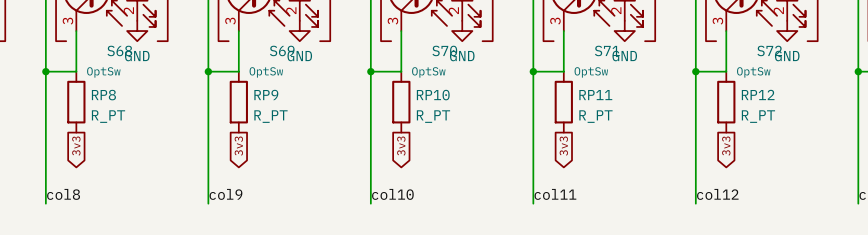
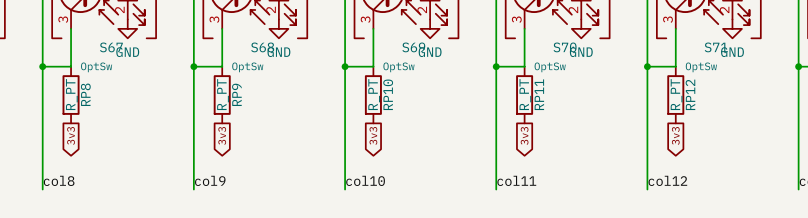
S68 name: S68 (119, 50) -> S67 (111, 47)
S69 name: S69 (282, 50) -> S68 (262, 47)
S70 name: S70 (444, 50) -> S69 (413, 47)
S71 name: S71 (607, 50) -> S70 (565, 47)
S72 name: S72 (769, 50) -> S71 (716, 47)
RP9 name rotation: 0° (266, 94) -> 90° counterclockwise (236, 94)
RP12 name rotation: 0° (758, 94) -> 90° counterclockwise (690, 94)
RP8 name rotation: 0° (103, 95) -> 90° counterclockwise (85, 94)
RP10 name rotation: 0° (433, 95) -> 90° counterclockwise (388, 94)
RP11 name rotation: 0° (595, 95) -> 90° counterclockwise (539, 94)
RP8 value rotation: 0° (108, 116) -> 90° counterclockwise (71, 94)
RP9 value rotation: 0° (270, 116) -> 90° counterclockwise (223, 94)
RP10 value rotation: 0° (433, 116) -> 90° counterclockwise (374, 94)
RP11 value rotation: 0° (595, 116) -> 90° counterclockwise (525, 94)
RP12 value rotation: 0° (758, 116) -> 90° counterclockwise (676, 94)

